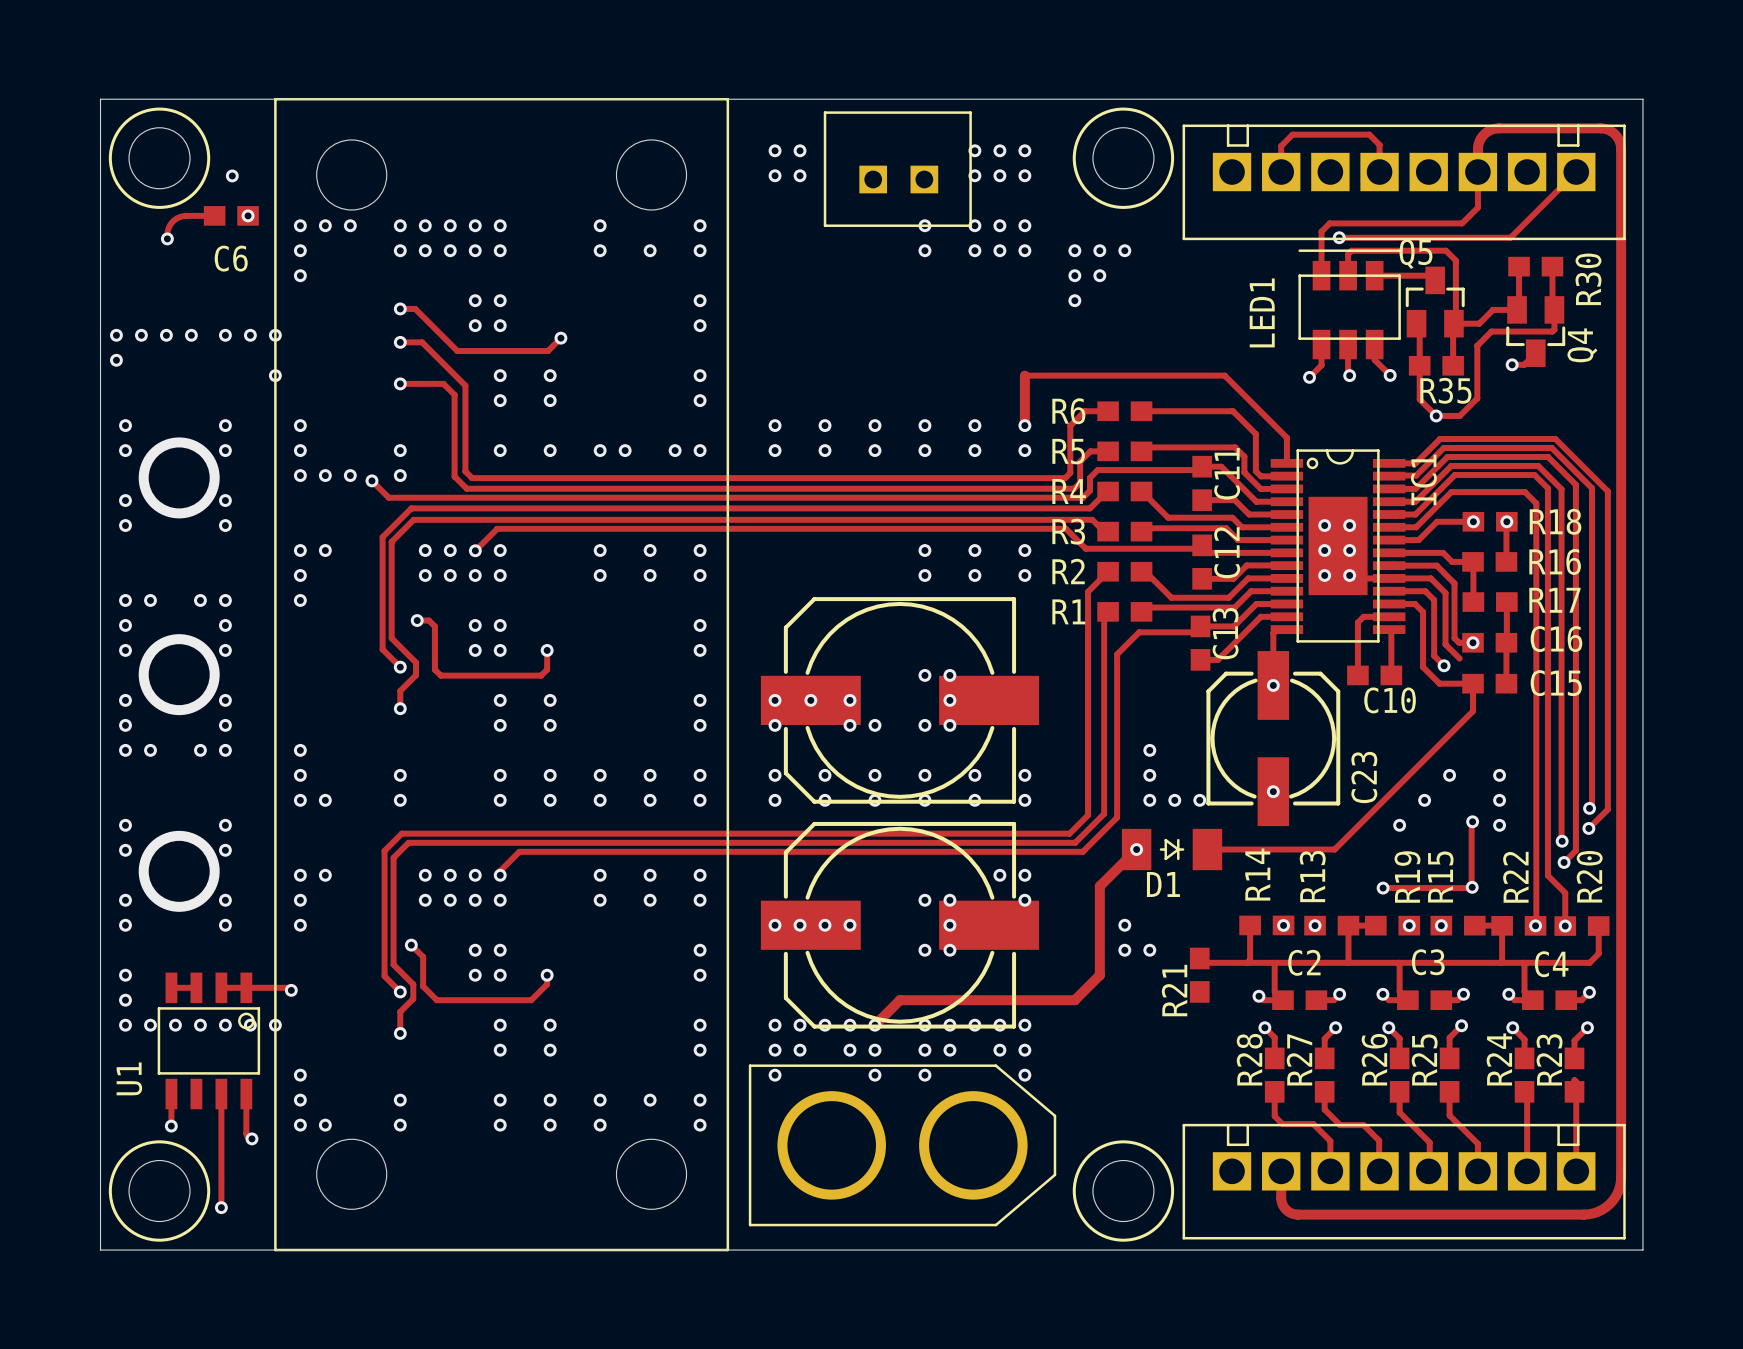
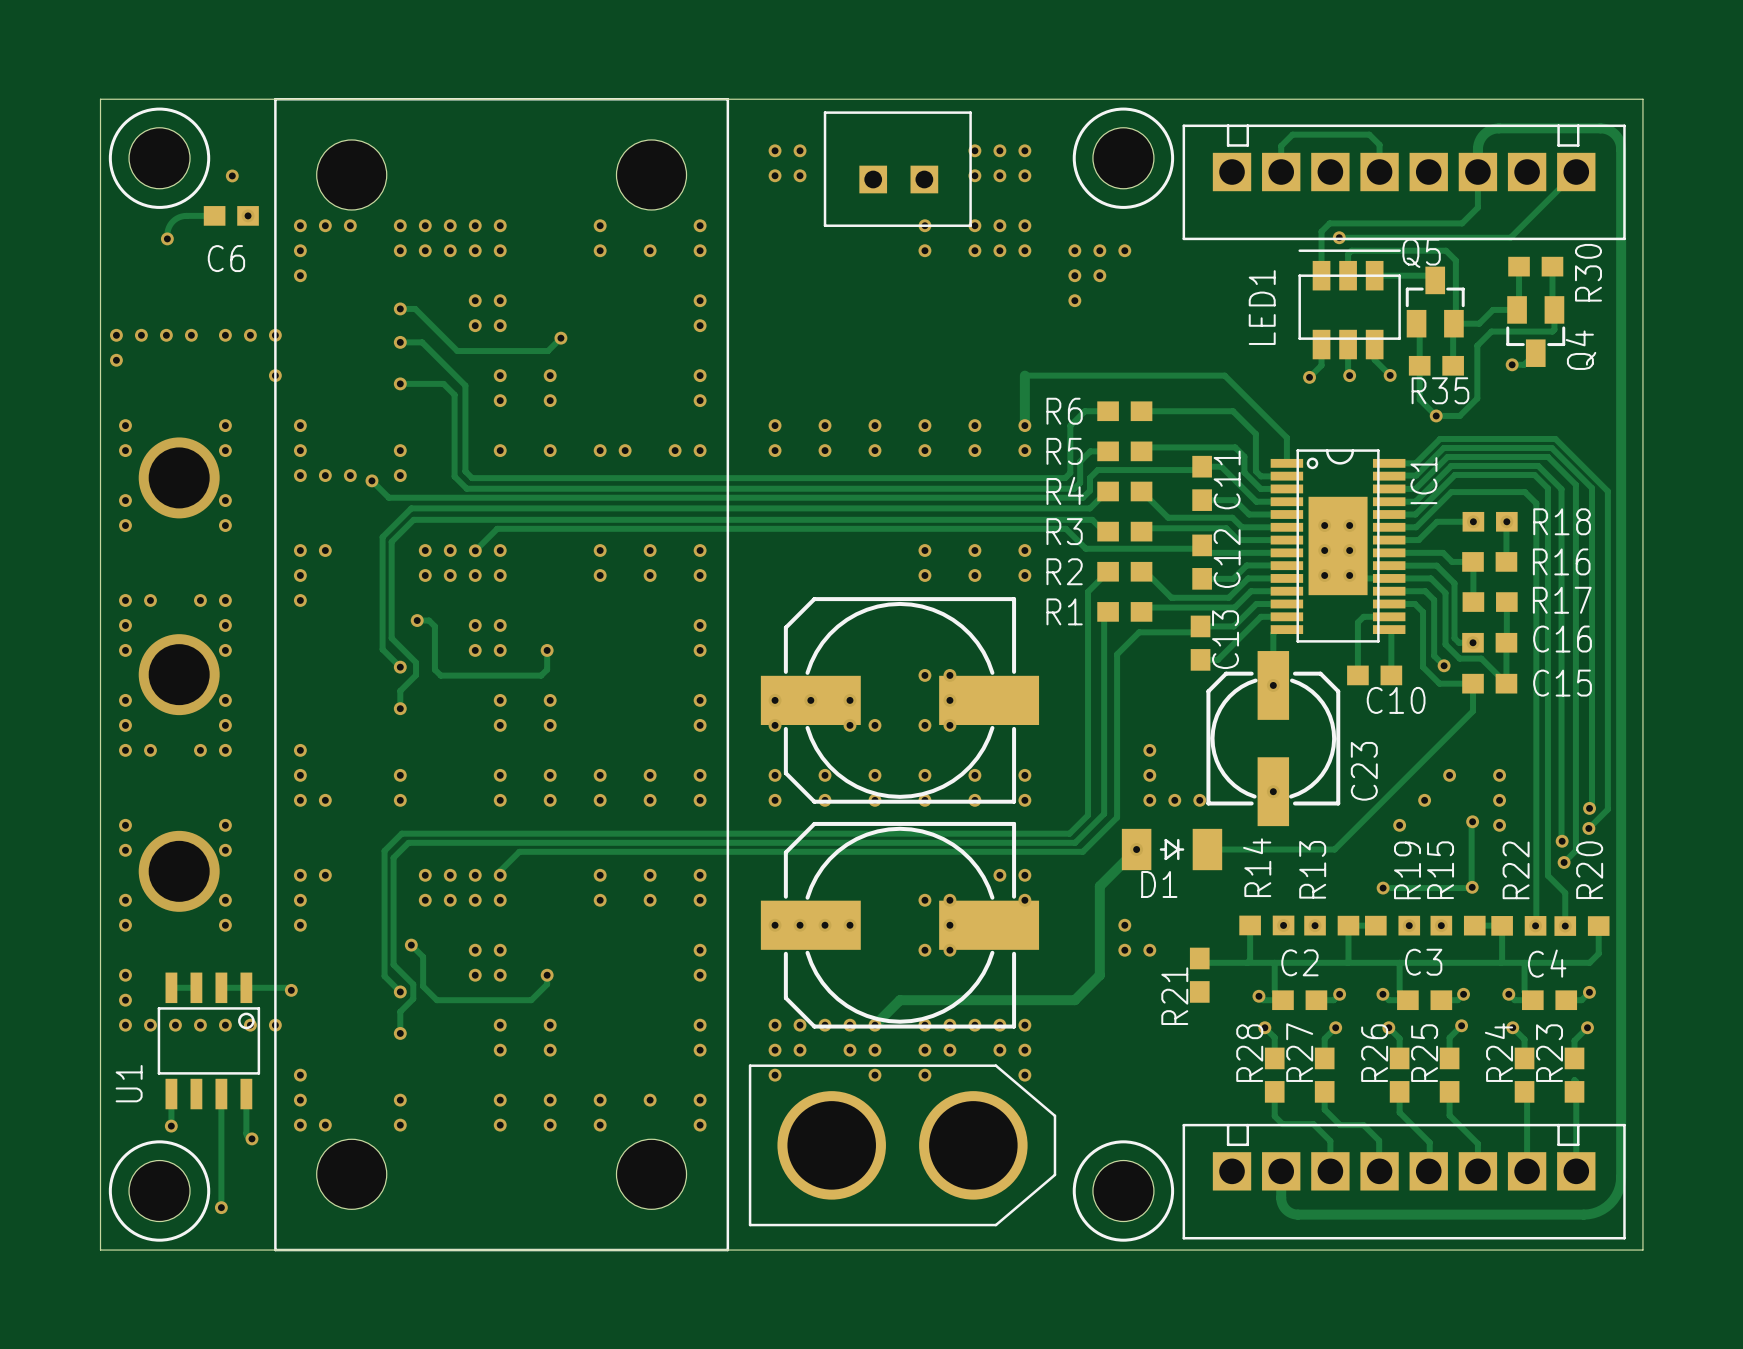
track: none -> (1459, 658) (1481, 658) (1506, 683)

